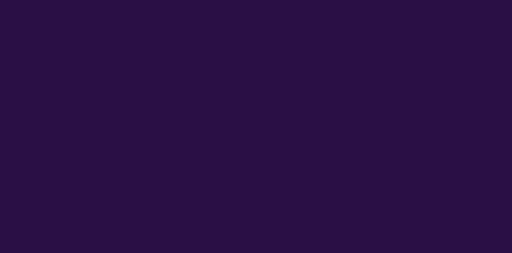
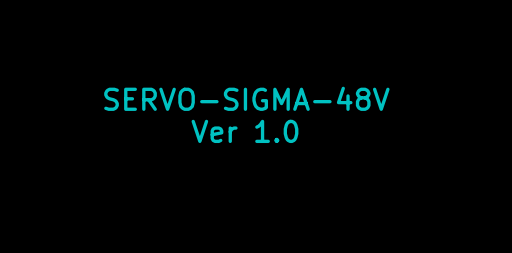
text: none -> SERVO-SIGMA-48V (246, 98)
text: none -> Ver 1.0 (244, 131)

